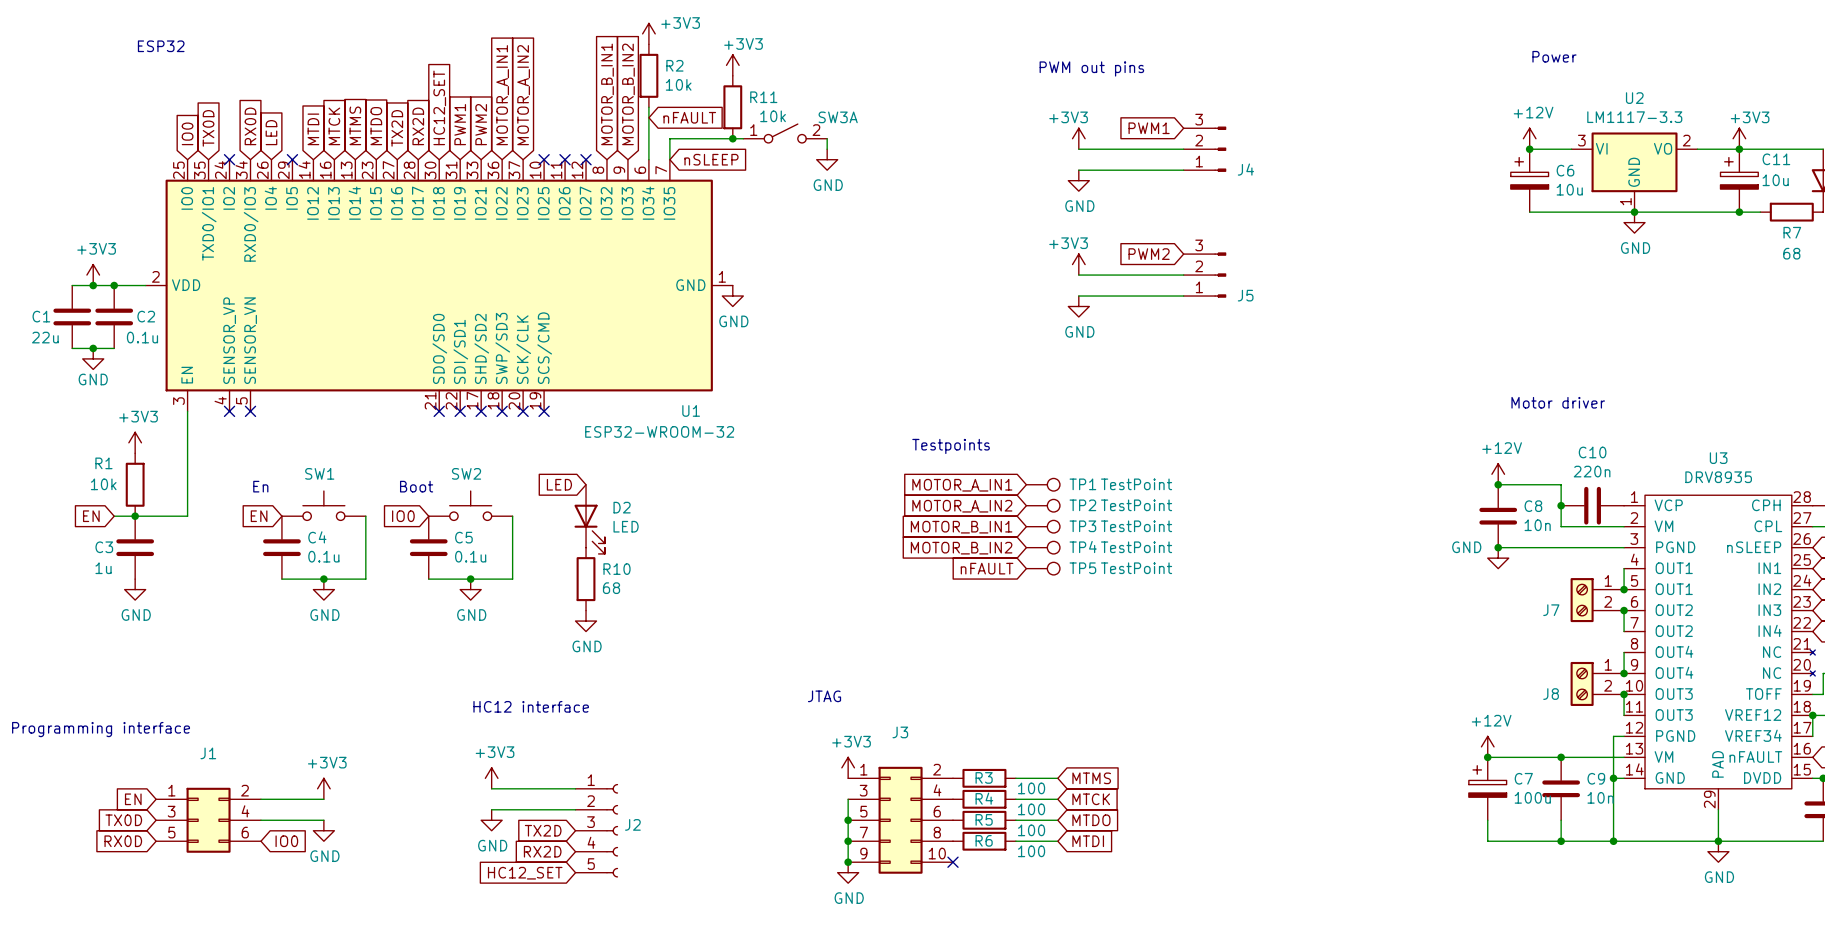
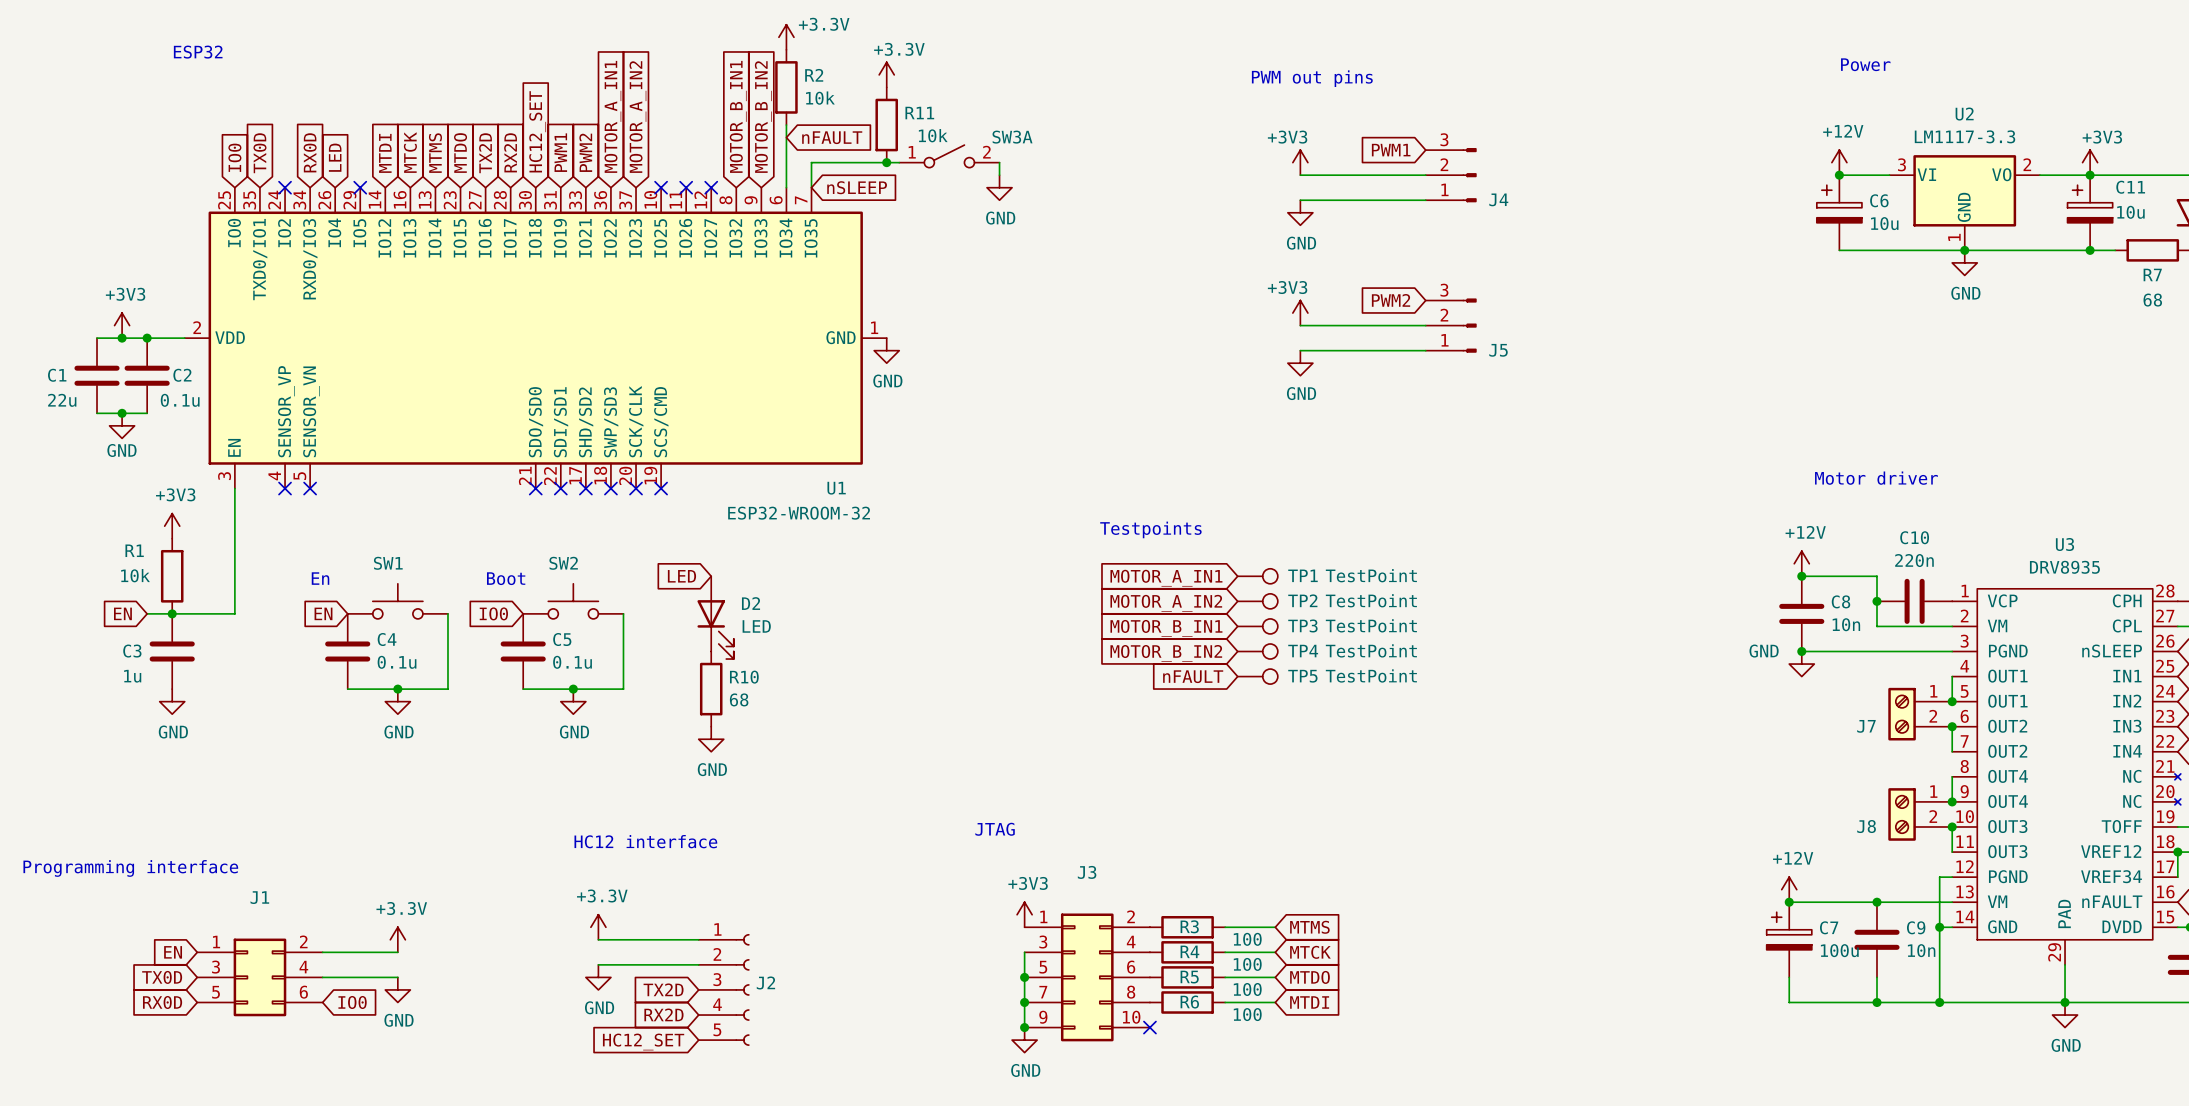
power symbol: +3V3 (648, 33) -> +3.3V (786, 37)
power symbol: +3V3 (732, 65) -> +3.3V (886, 74)
power symbol: +3V3 (491, 778) -> +3.3V (598, 927)
power symbol: +3V3 (323, 788) -> +3.3V (397, 939)

